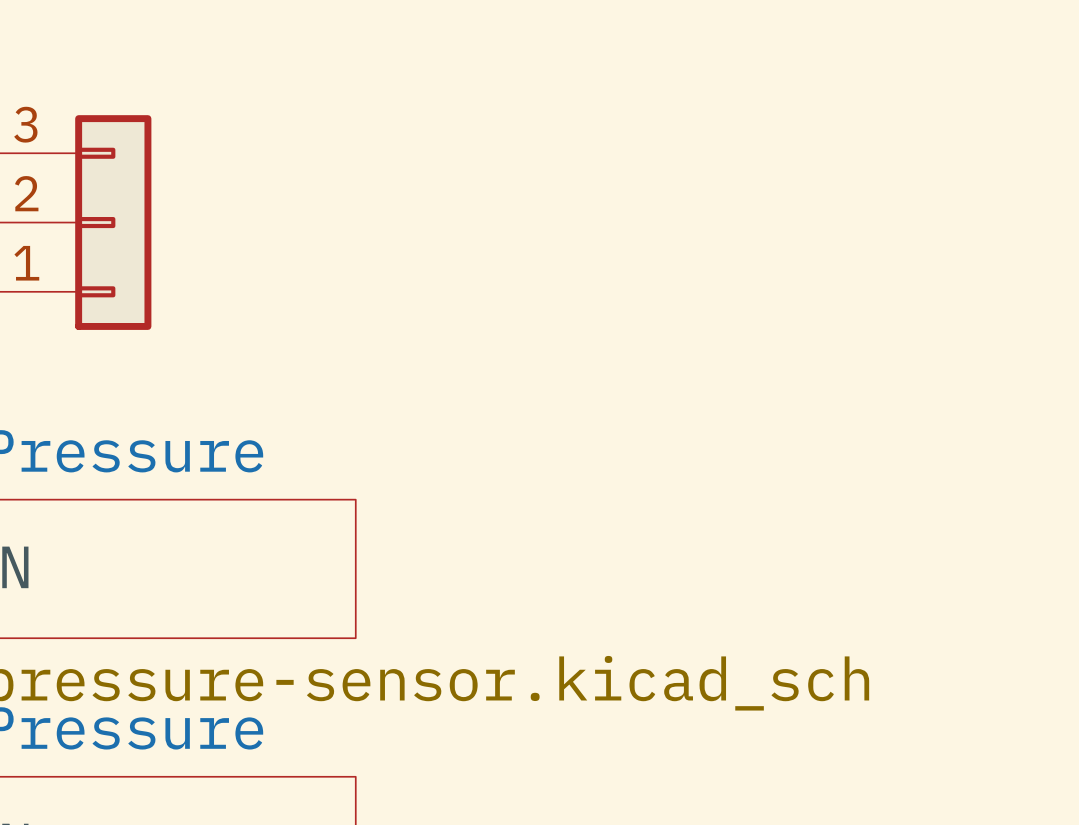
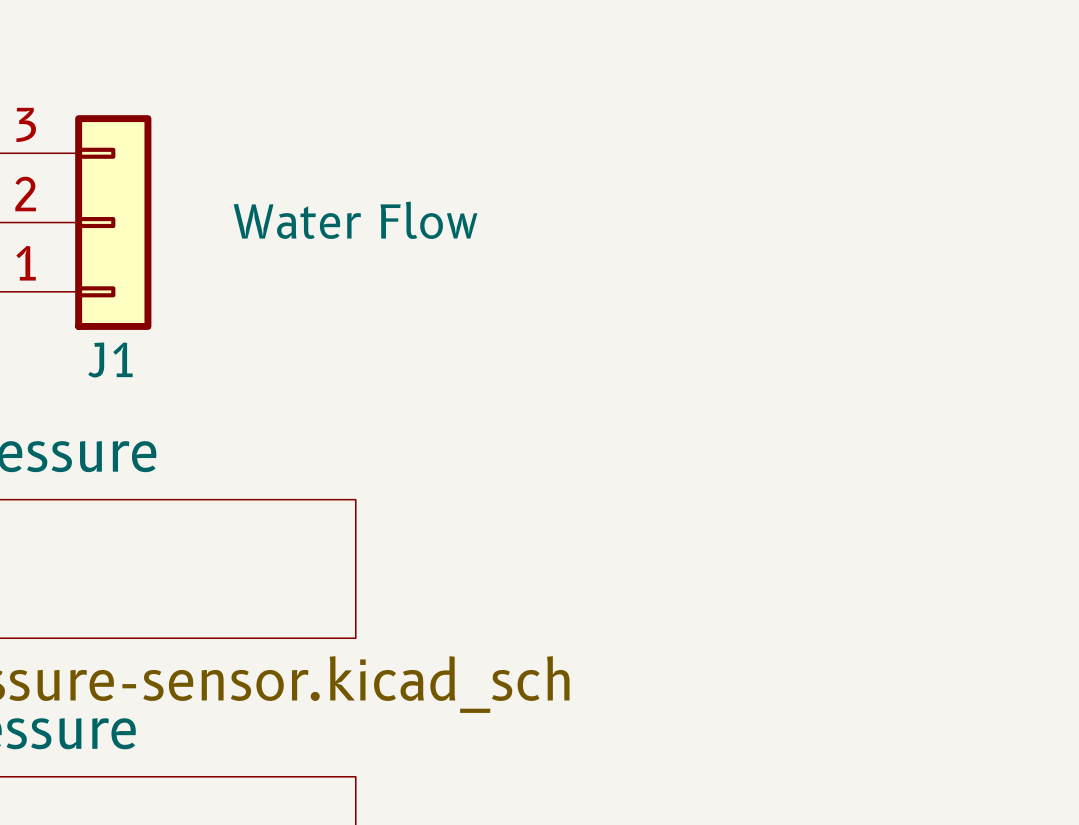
J1 value: none -> Water Flow (355, 220)
J1 name: none -> J1 (110, 360)

